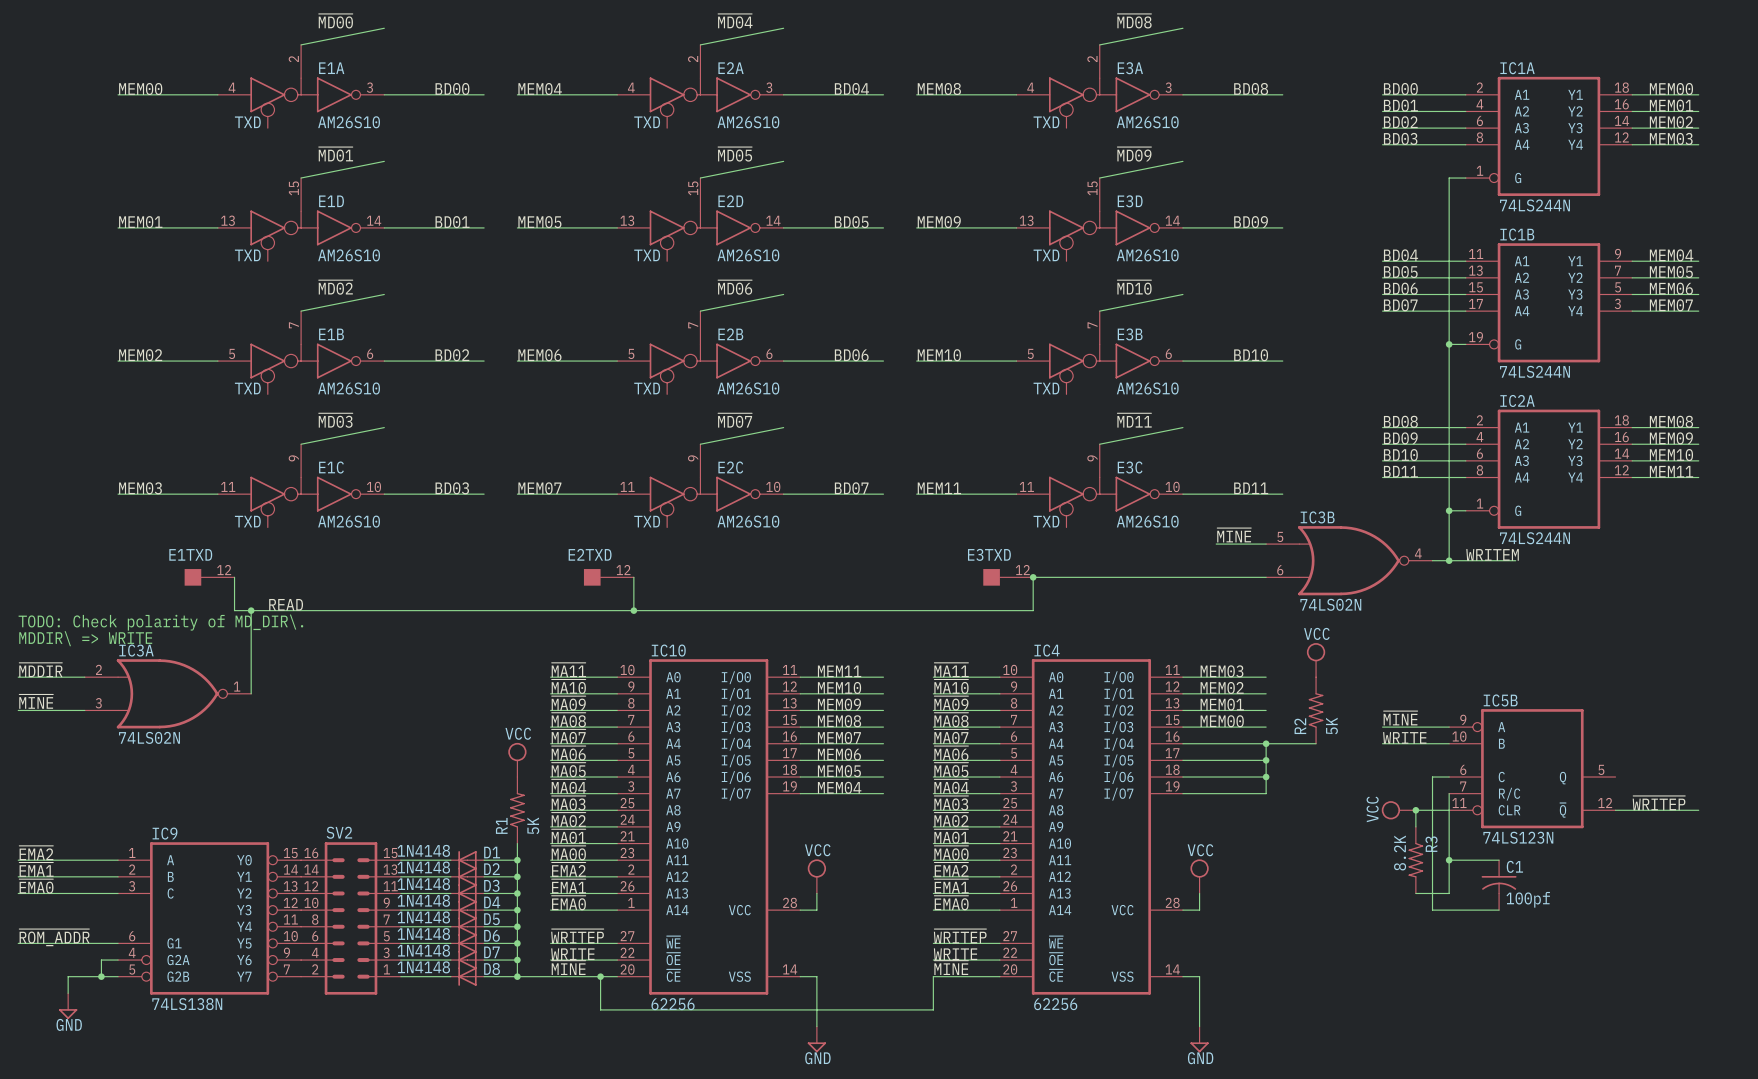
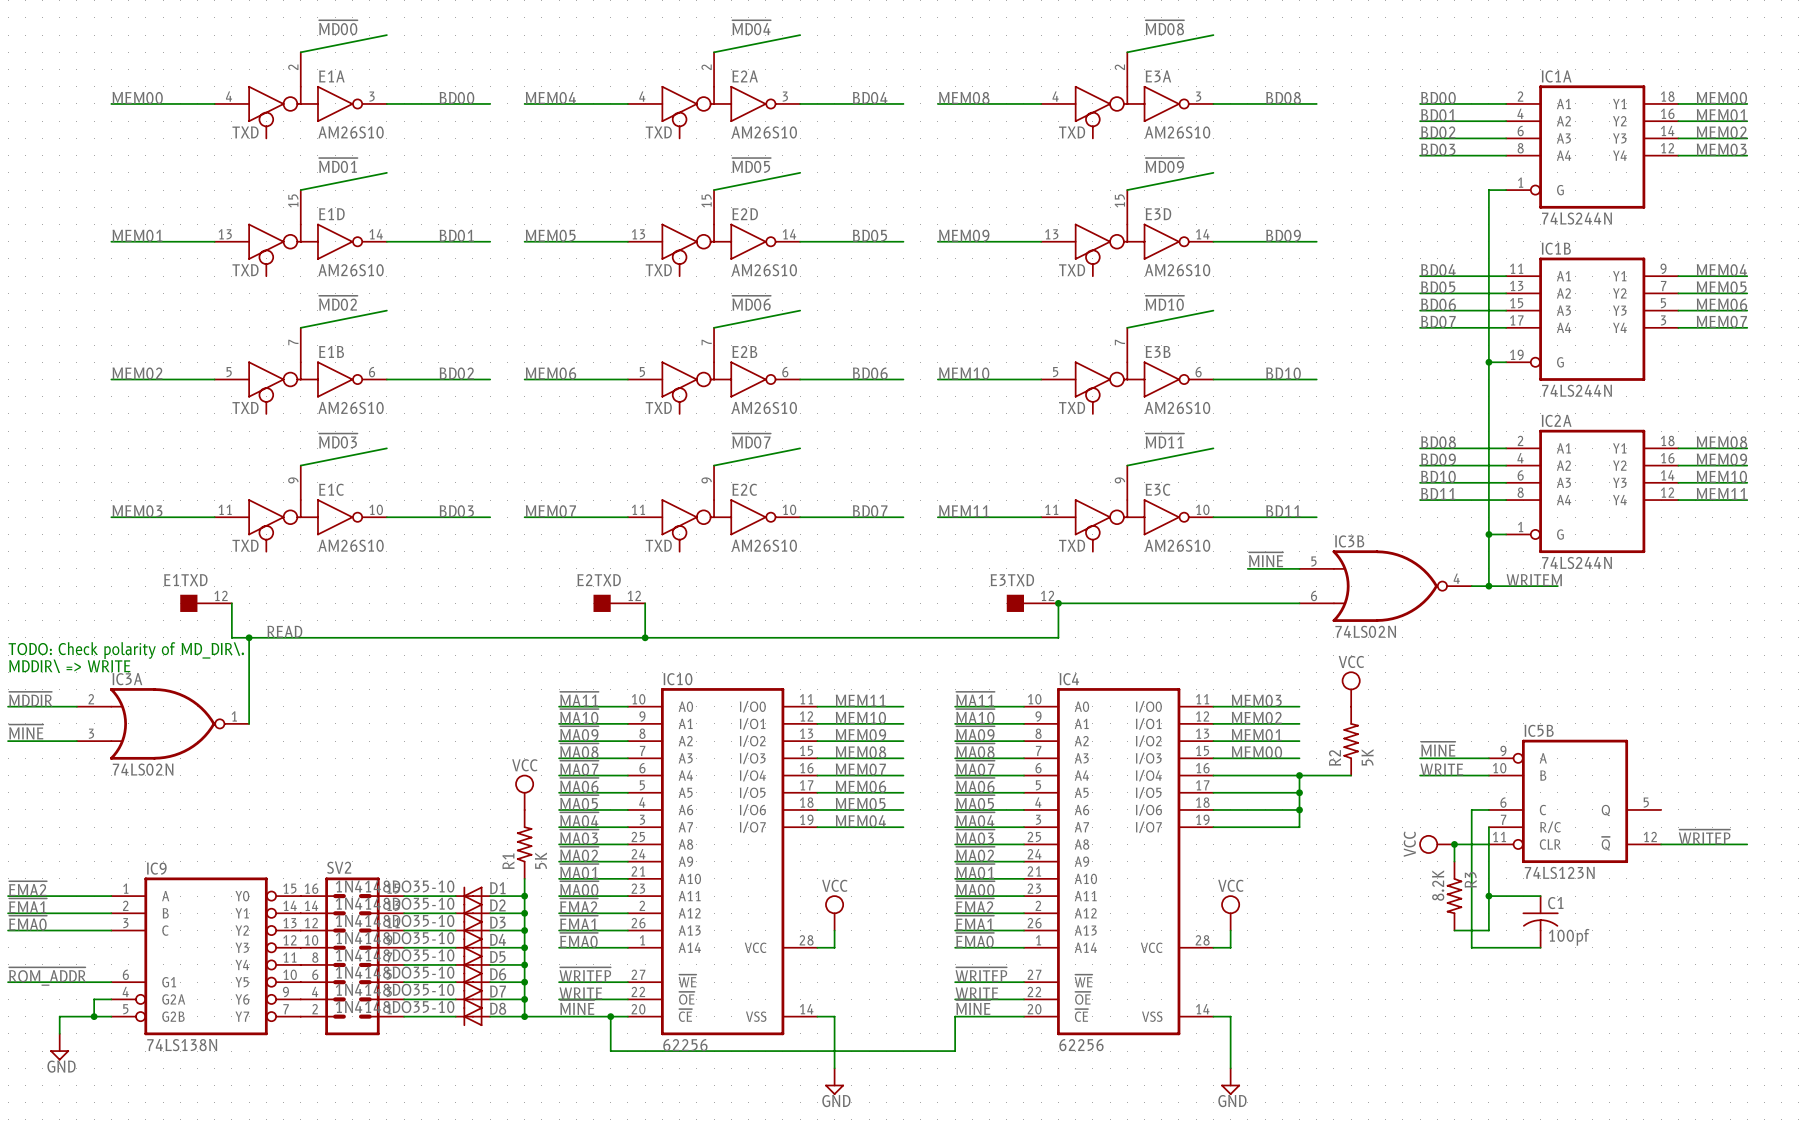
D1 value: 1N4148 (423, 850) -> 1N4148DO35-10 (395, 886)
D2 value: 1N4148 (423, 867) -> 1N4148DO35-10 (395, 903)
D3 value: 1N4148 (423, 884) -> 1N4148DO35-10 (395, 920)
D4 value: 1N4148 (423, 900) -> 1N4148DO35-10 (395, 938)
D5 value: 1N4148 (423, 917) -> 1N4148DO35-10 (395, 955)
D6 value: 1N4148 (423, 934) -> 1N4148DO35-10 (395, 972)
D7 value: 1N4148 (423, 950) -> 1N4148DO35-10 (395, 989)
D8 value: 1N4148 (423, 967) -> 1N4148DO35-10 (395, 1007)

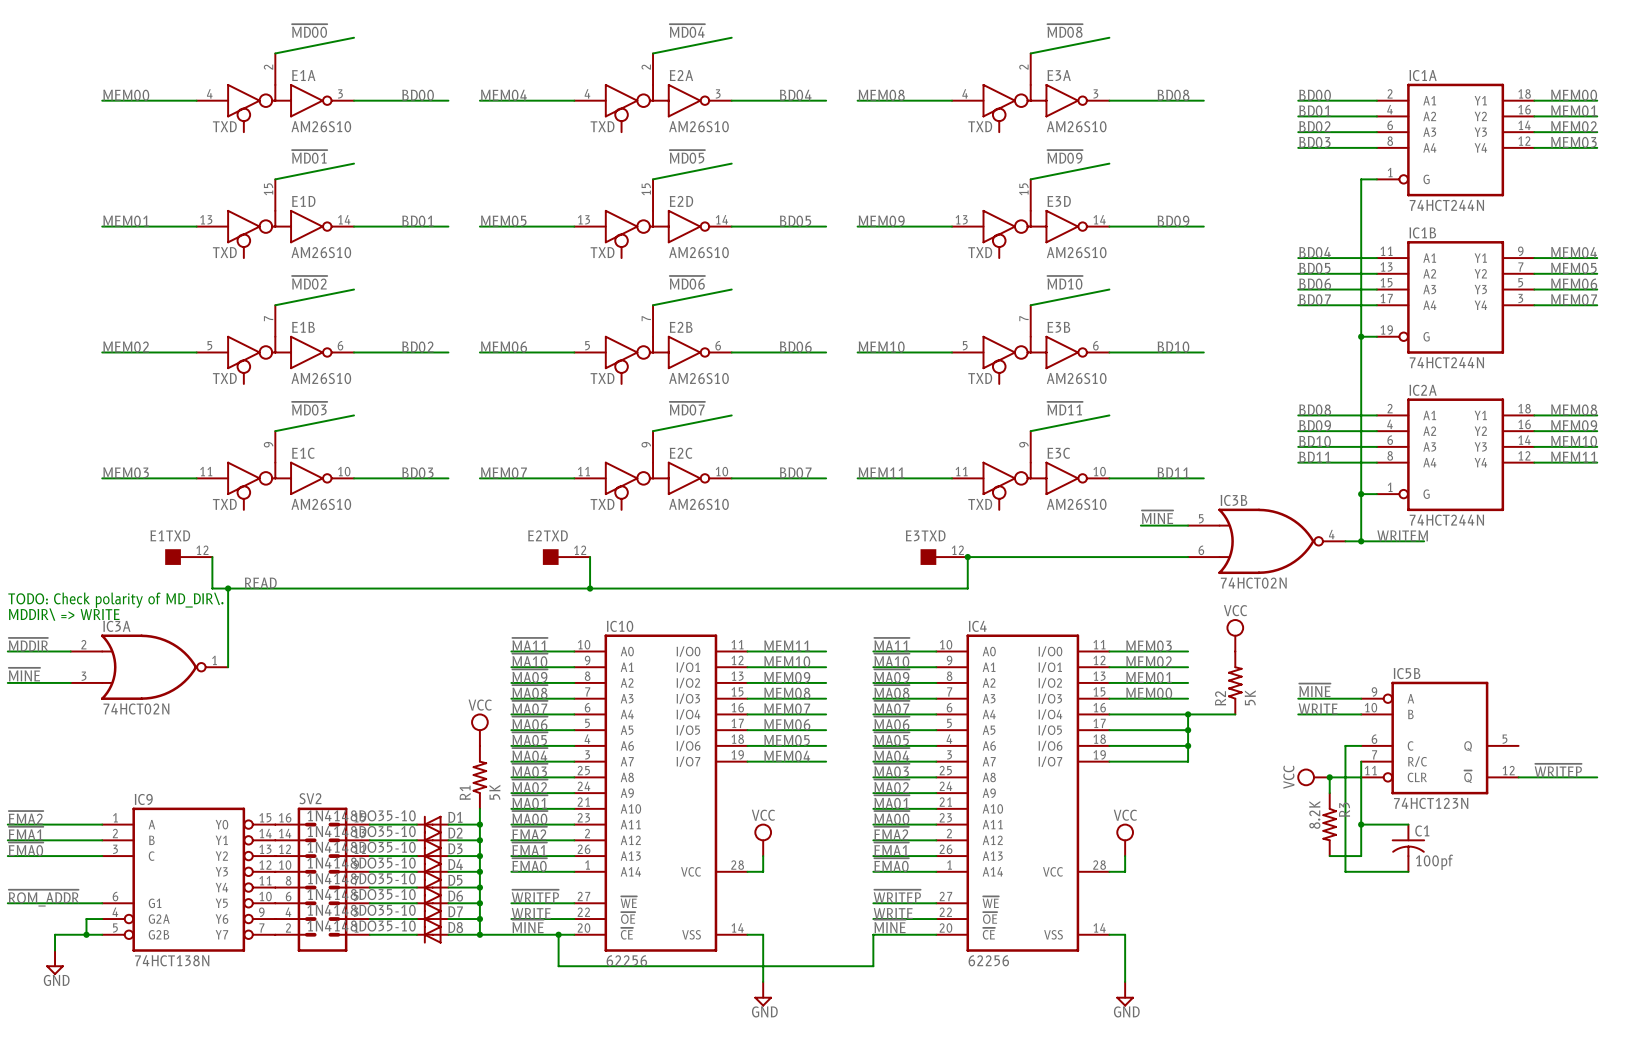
IC1A value: 74LS244N (1576, 218) -> 74HCT244N (1446, 205)
IC1B value: 74LS244N (1576, 390) -> 74HCT244N (1446, 362)
IC2A value: 74LS244N (1576, 562) -> 74HCT244N (1446, 520)
IC3B value: 74LS02N (1365, 631) -> 74HCT02N (1253, 583)
IC3A value: 74LS02N (143, 769) -> 74HCT02N (136, 708)
IC5B value: 74LS123N (1559, 872) -> 74HCT123N (1431, 803)
IC9 value: 74LS138N (182, 1045) -> 74HCT138N (172, 960)

